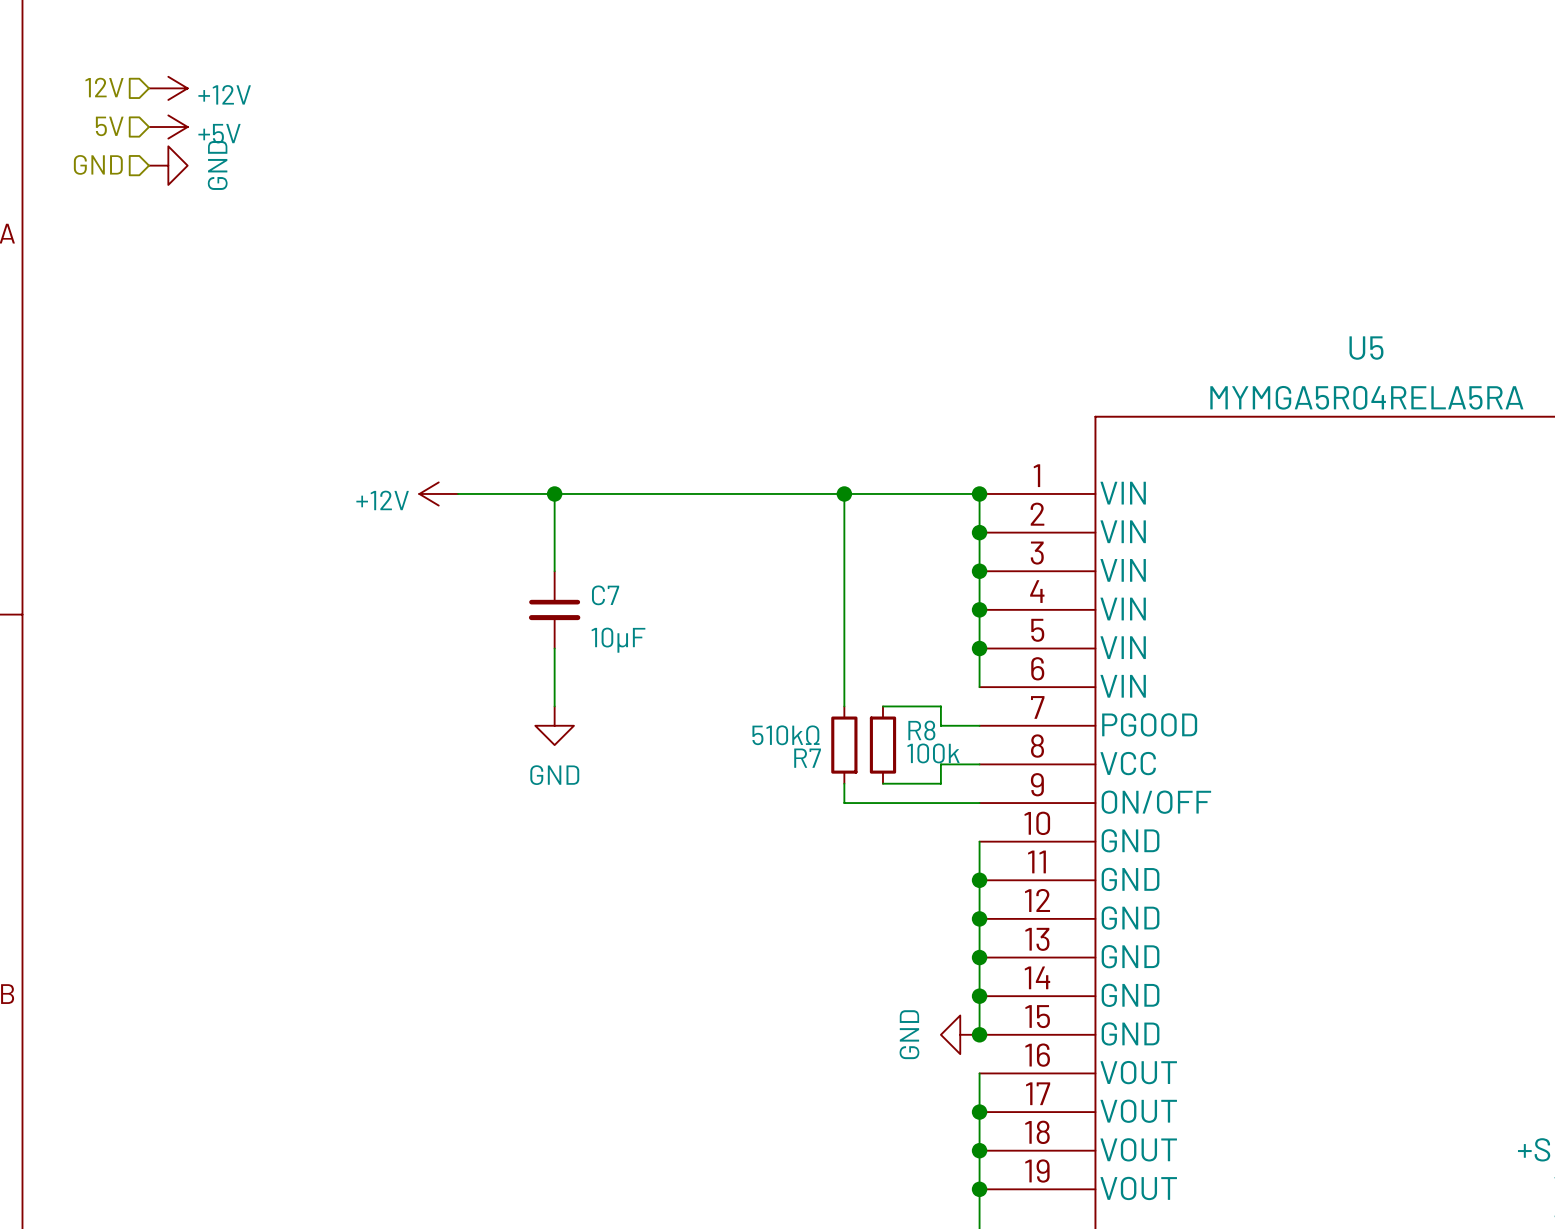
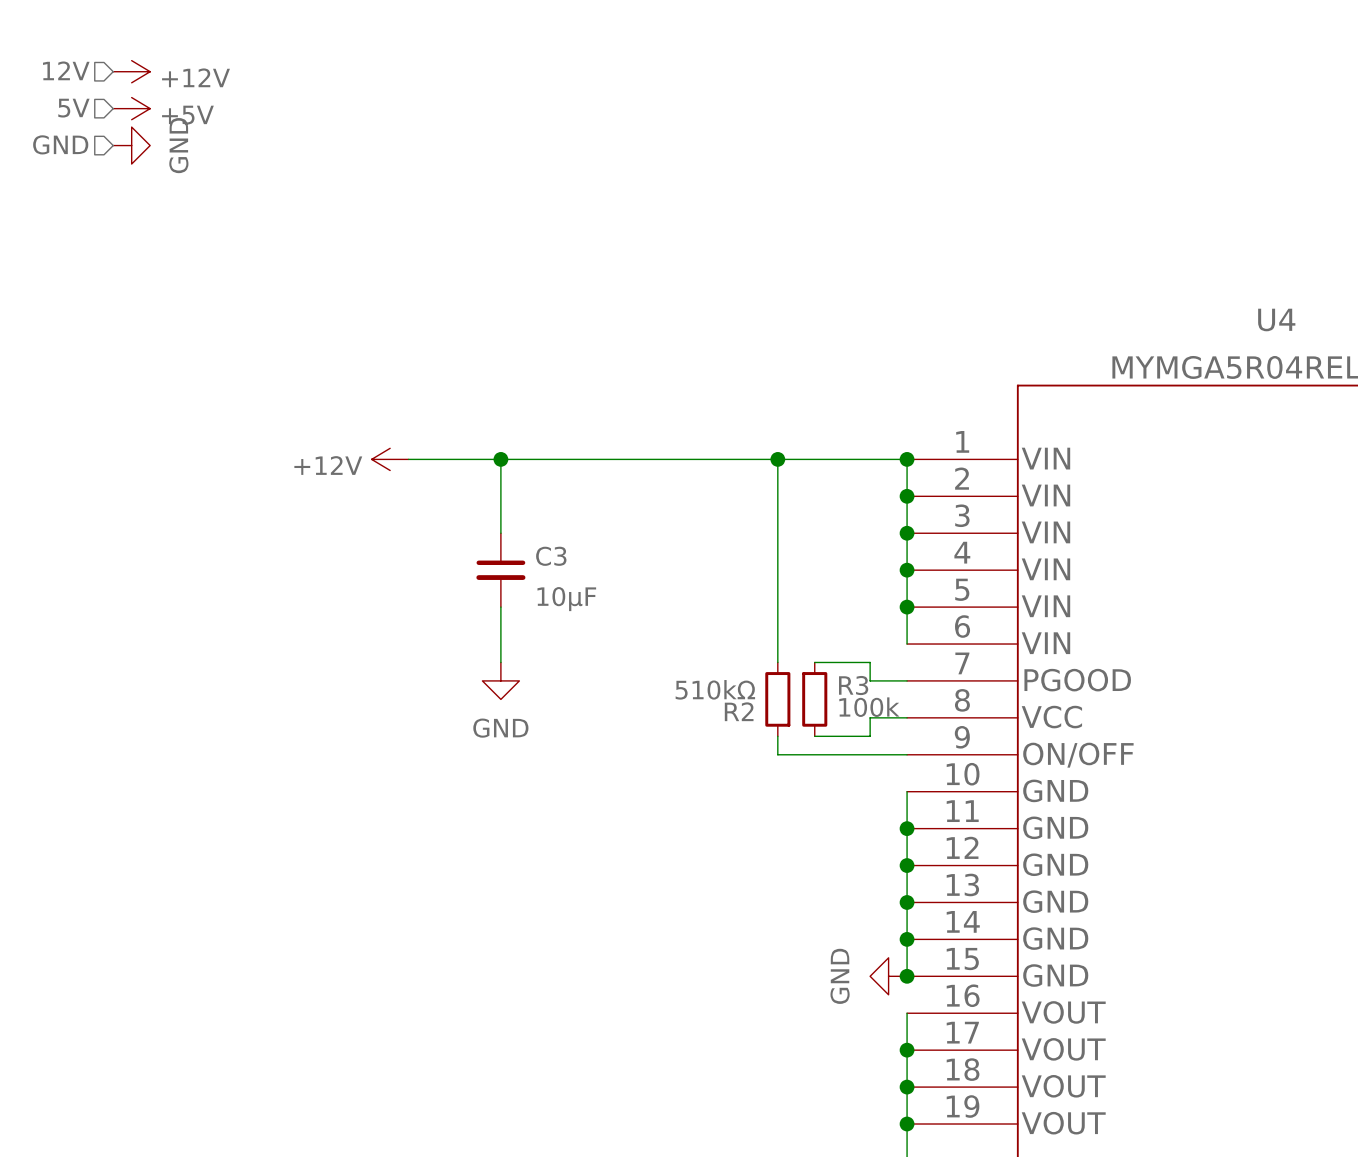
U5 name: U5 (1366, 348) -> U4 (1276, 320)
C7 name: C7 (605, 595) -> C3 (551, 556)
R8 name: R8 (921, 730) -> R3 (853, 685)
R7 name: R7 (807, 758) -> R2 (739, 711)

